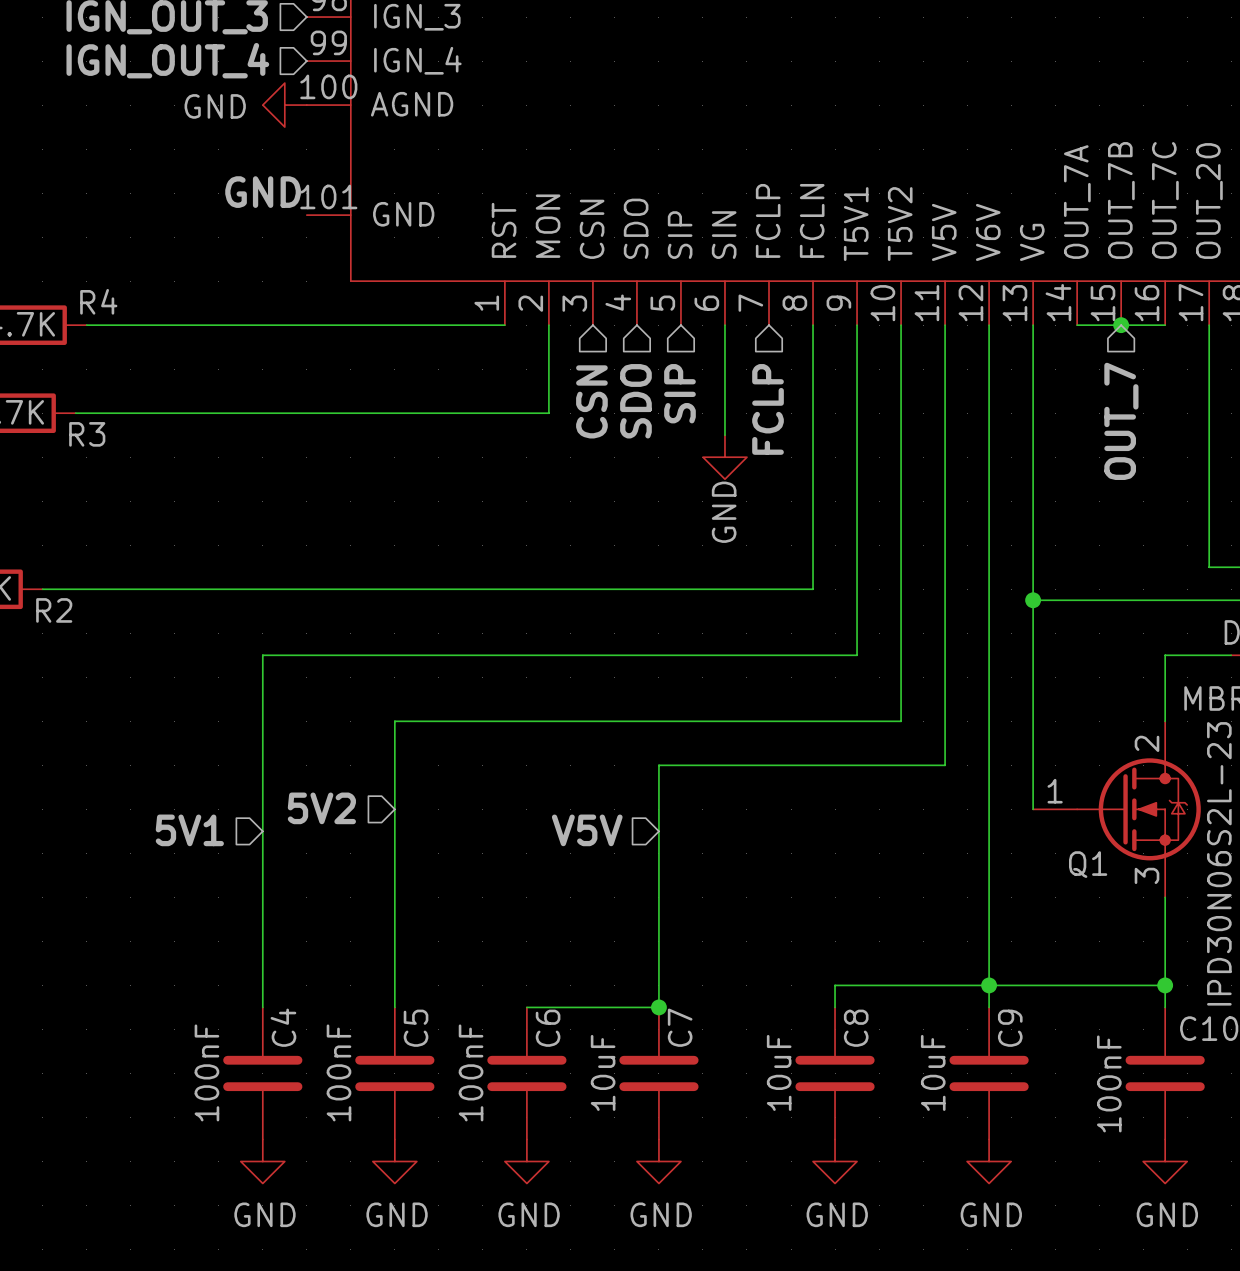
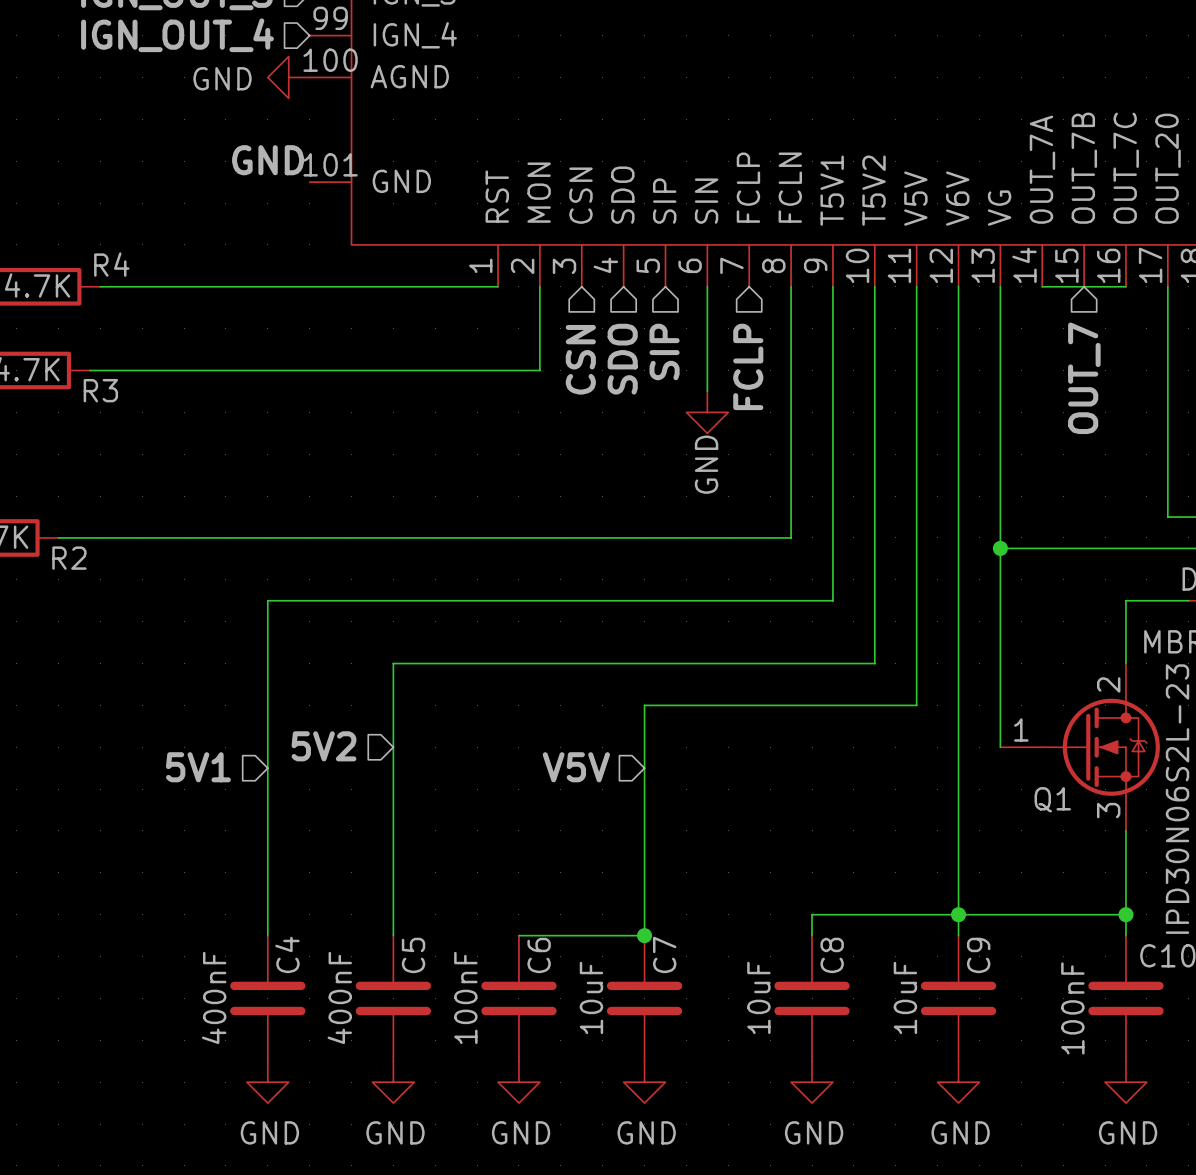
junction: (1121, 325) -> none
C4 value: 100nF (206, 1072) -> 400nF (214, 997)
C5 value: 100nF (339, 1072) -> 400nF (339, 997)

